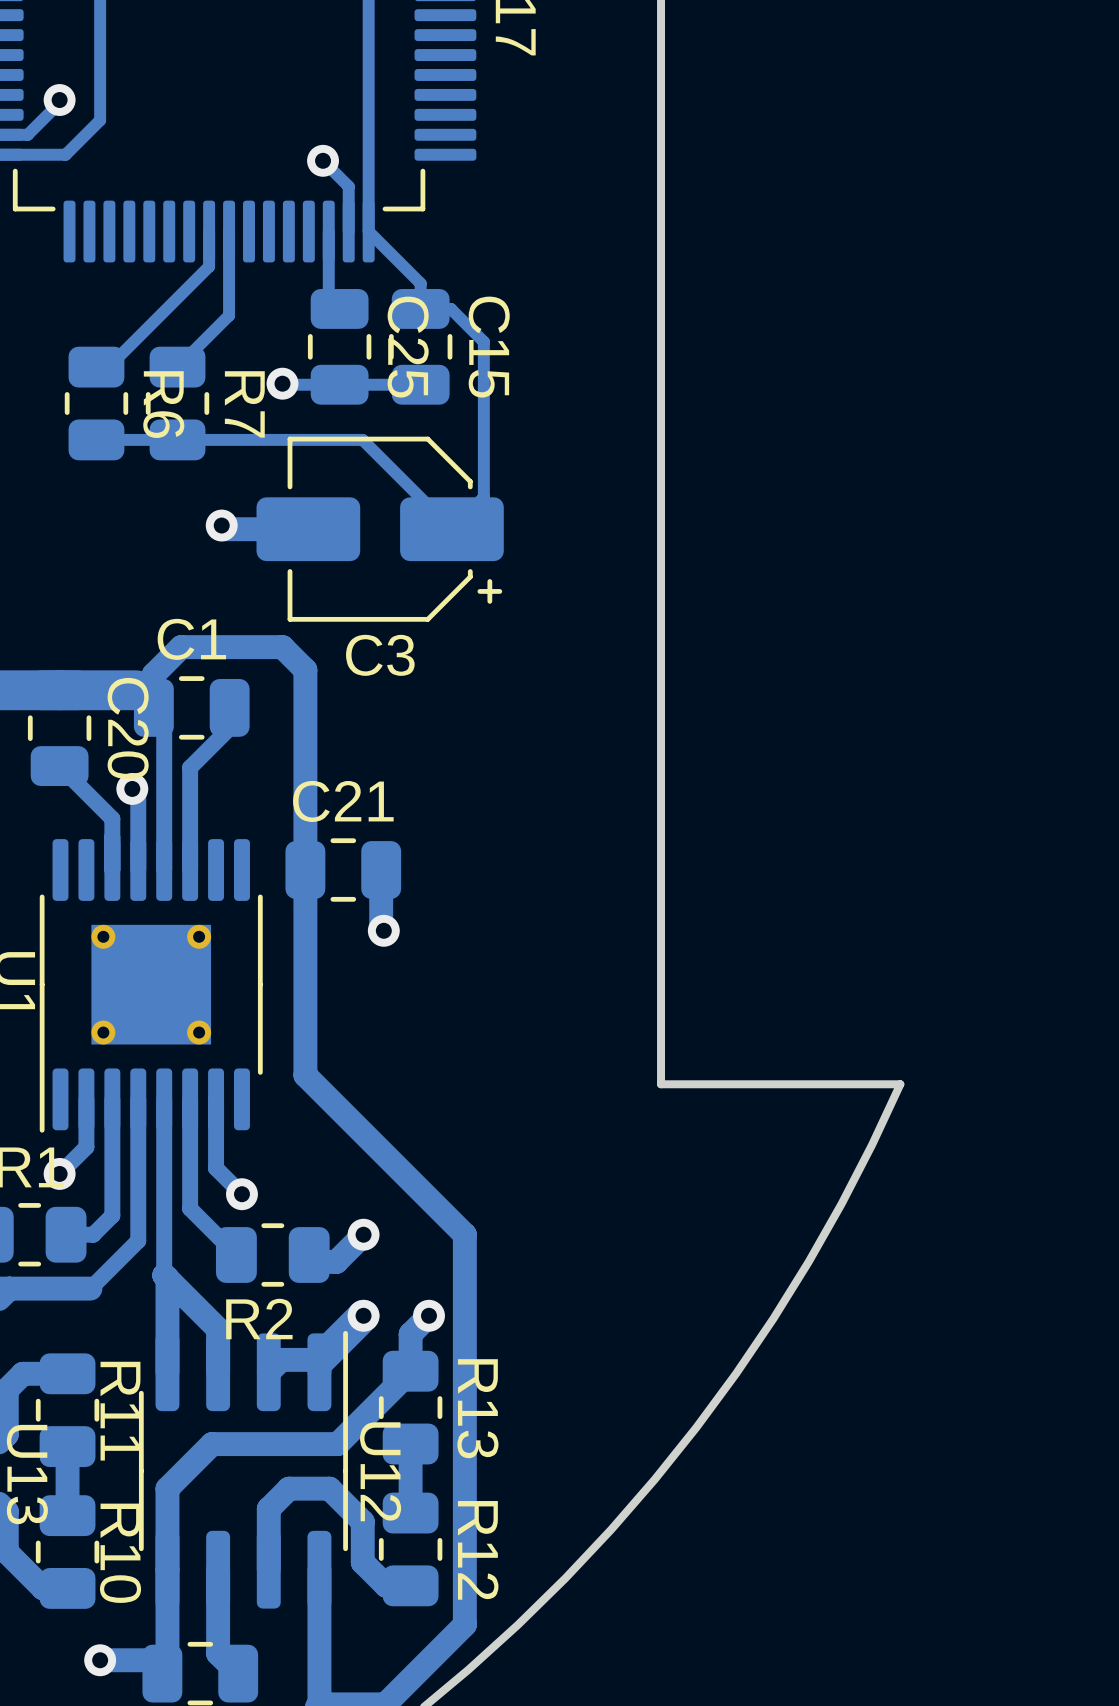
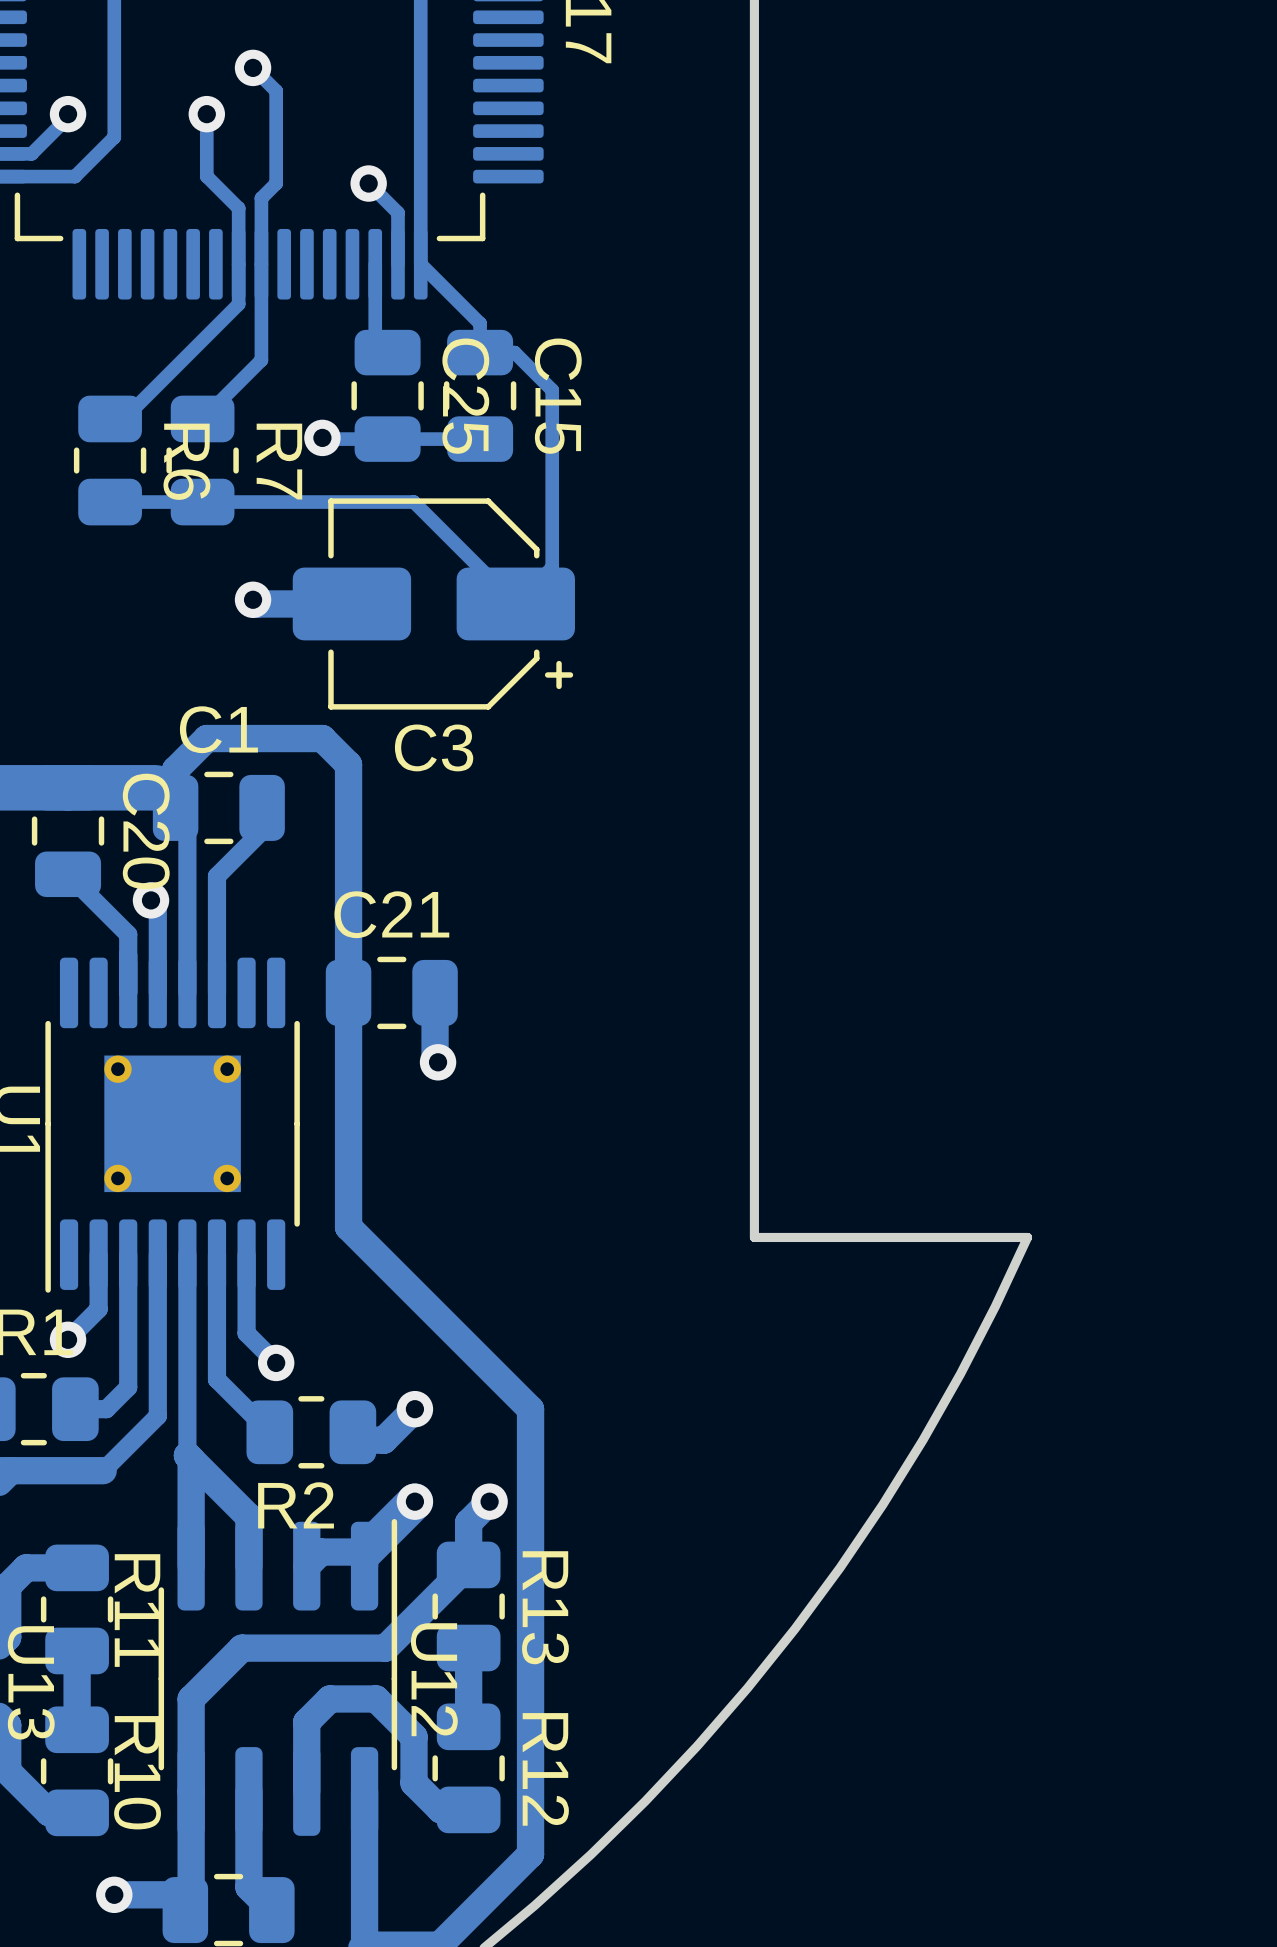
track: none -> (253, 67) (276, 91) (276, 183) (261, 198) (261, 264)
via: none -> (253, 67)
track: none -> (206, 114) (206, 176) (238, 208) (238, 264)
via: none -> (206, 114)

